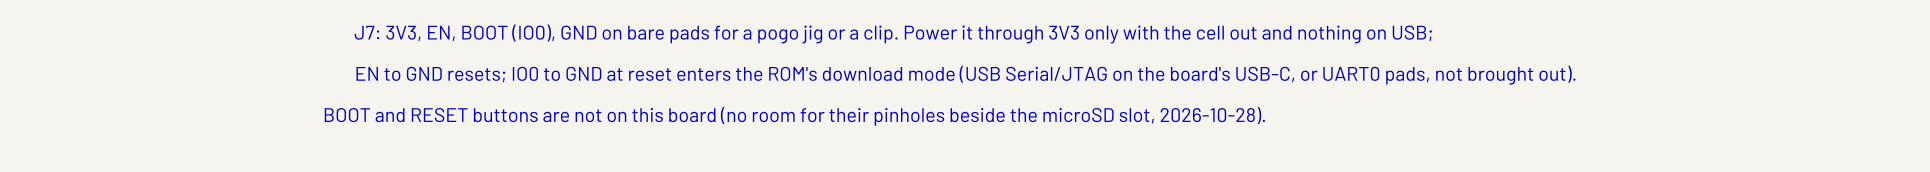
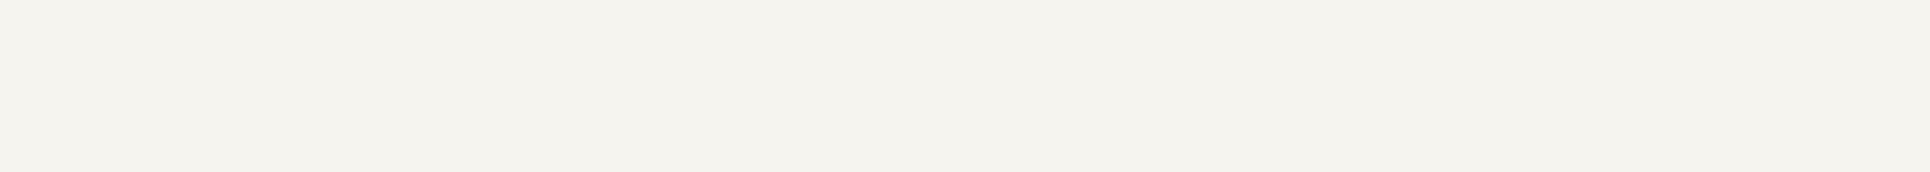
text: J7: 3V3, EN, BOOT (IO0), GND on bare pads for a pogo jig or a clip. Power it through 3V3 only with the cell out and nothing on USB; (893, 34) -> none
text: EN to GND resets; IO0 to GND at reset enters the ROM's download mode (USB Serial/JTAG on the board's USB-C, or UART0 pads, not brought out). (966, 75) -> none
text: BOOT and RESET buttons are not on this board (no room for their pinholes beside the microSD slot, 2026-10-28). (794, 116) -> none

